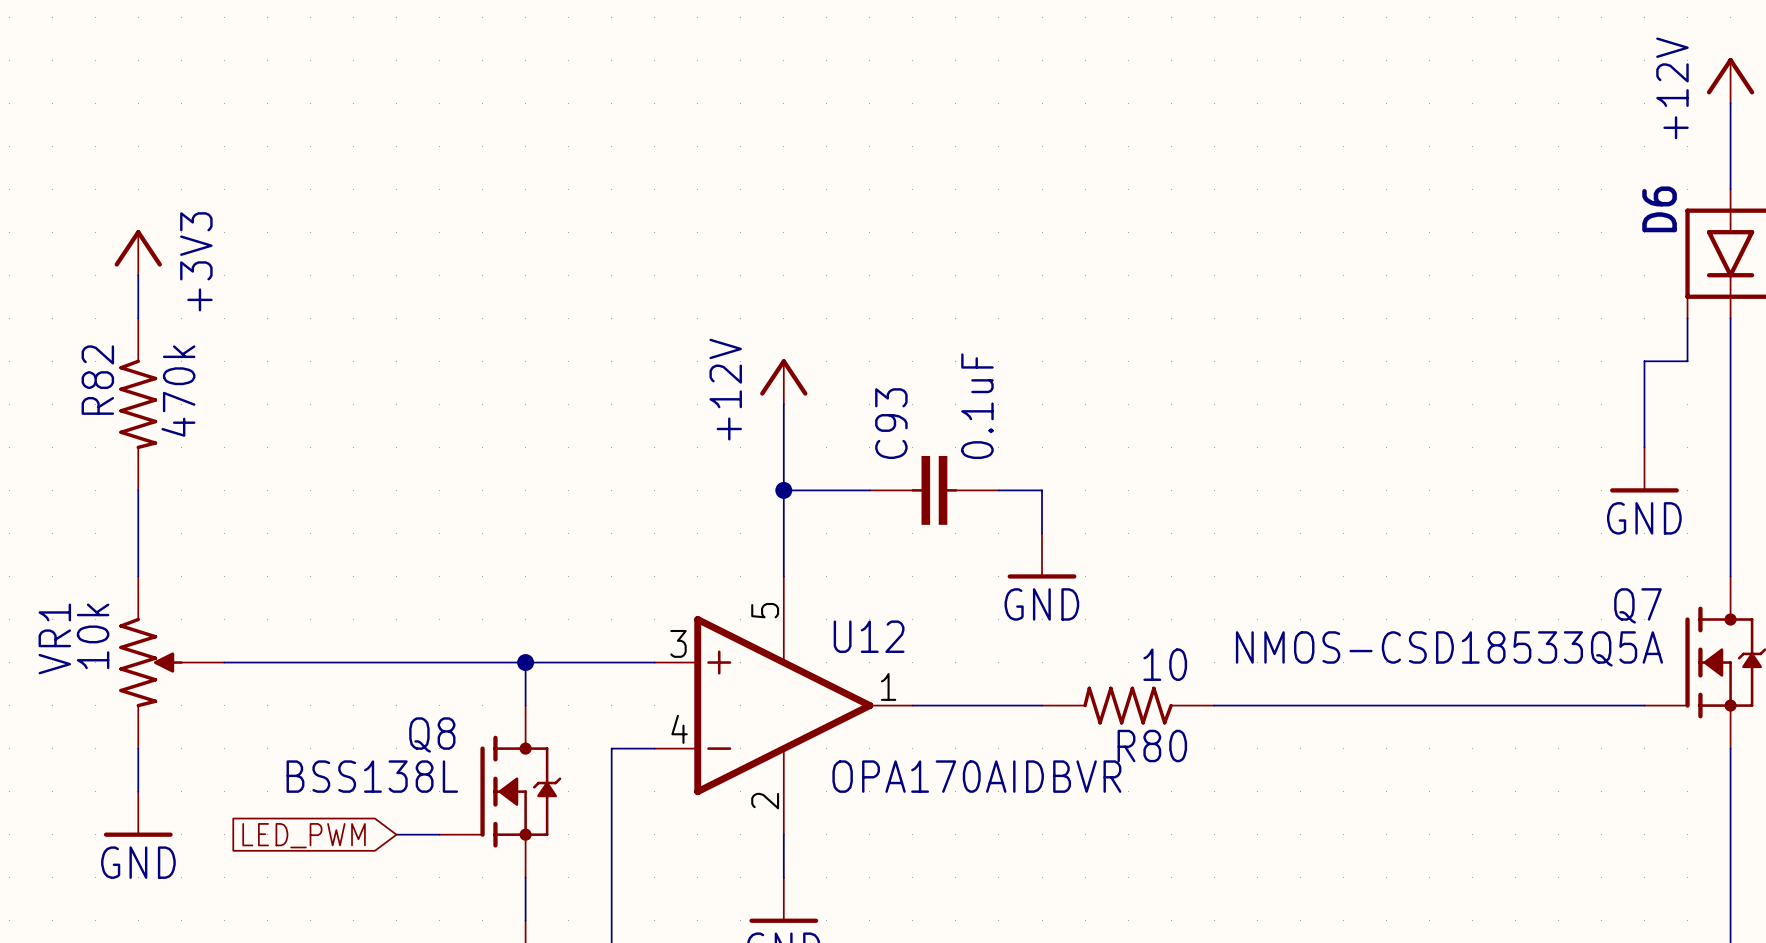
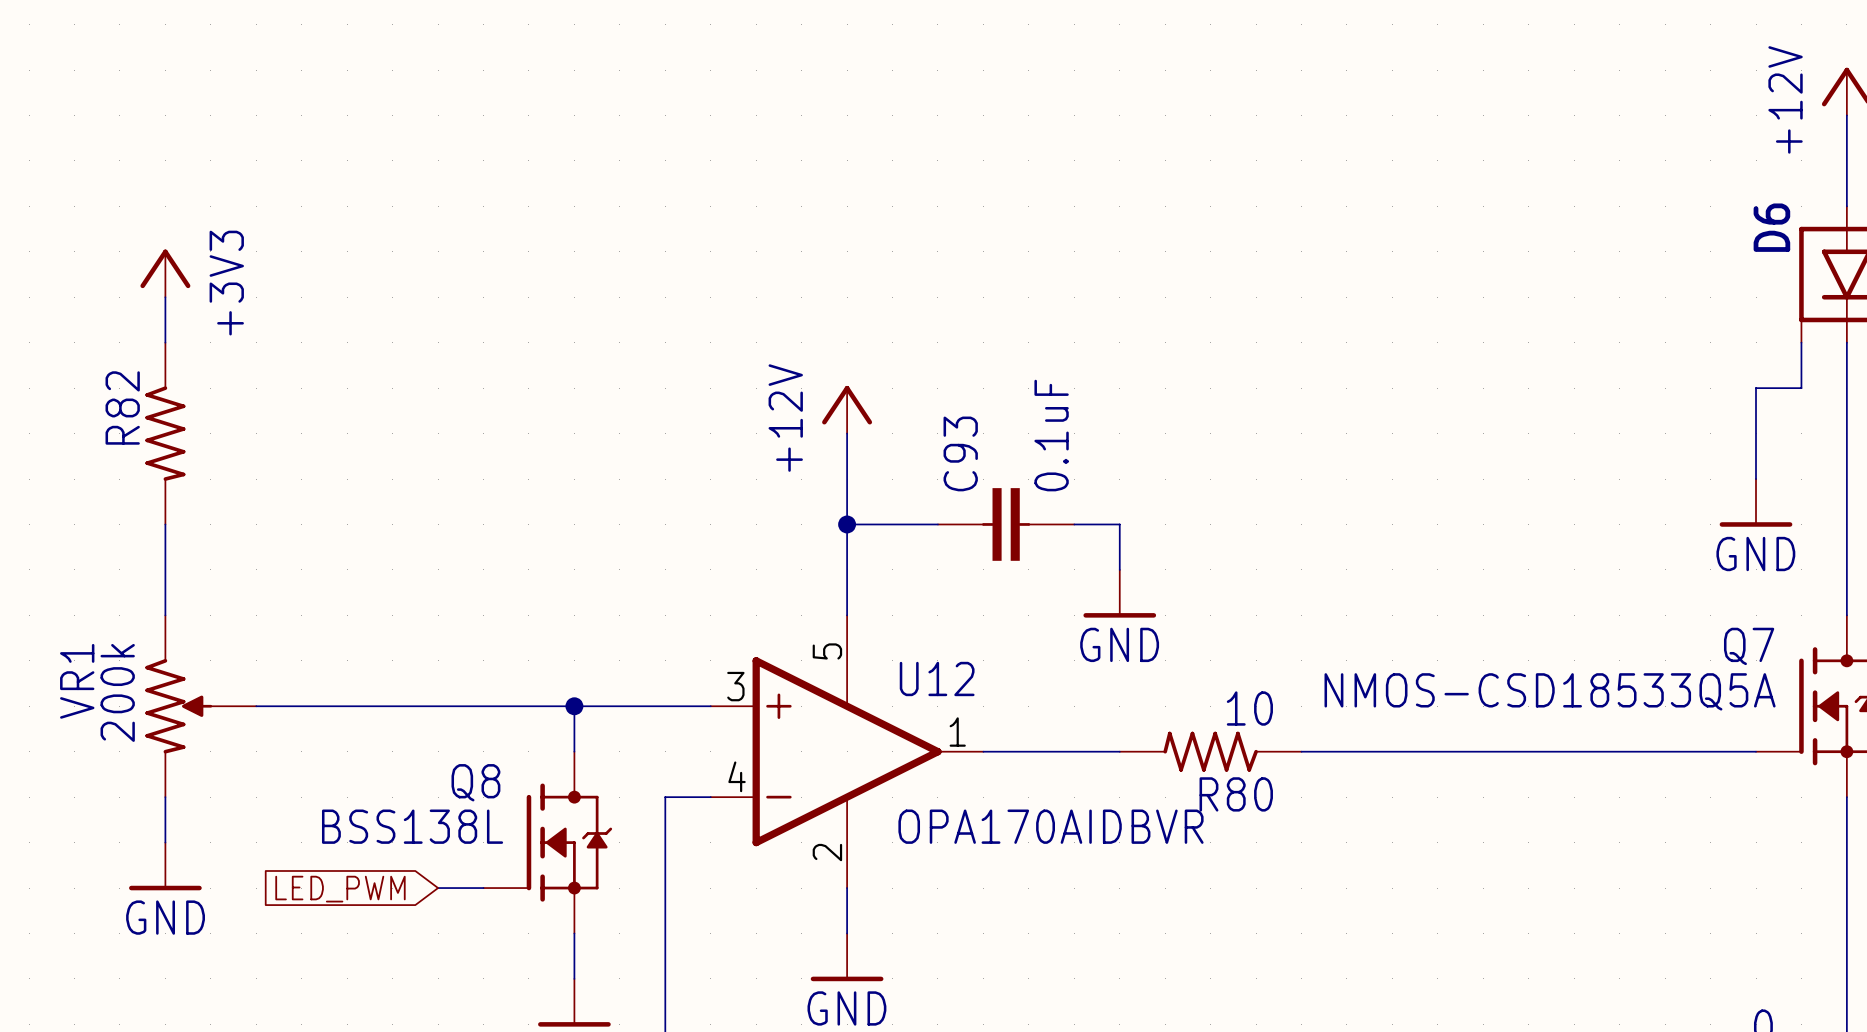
R82 value: 470k (178, 391) -> none
VR1 value: 10k (93, 636) -> 200k (117, 692)

